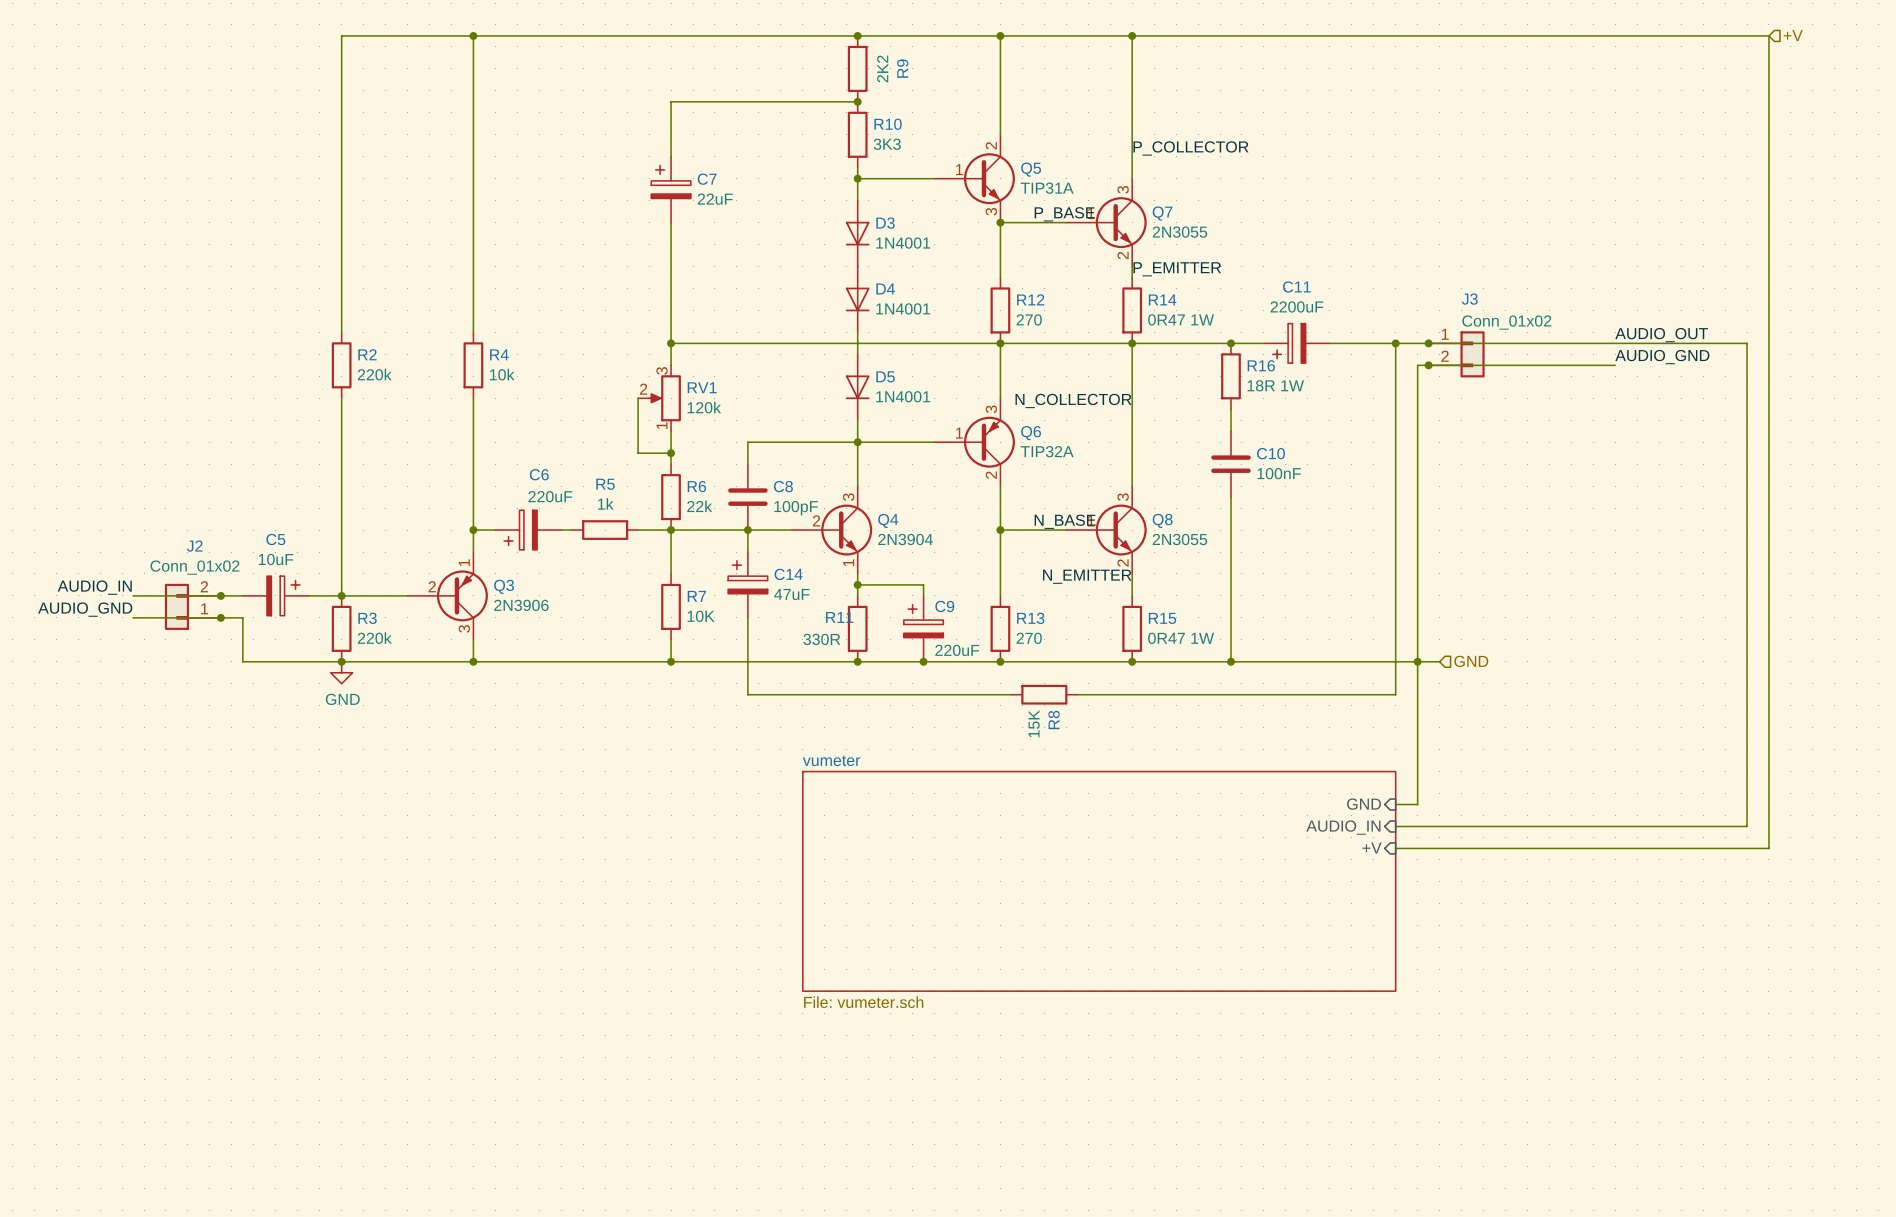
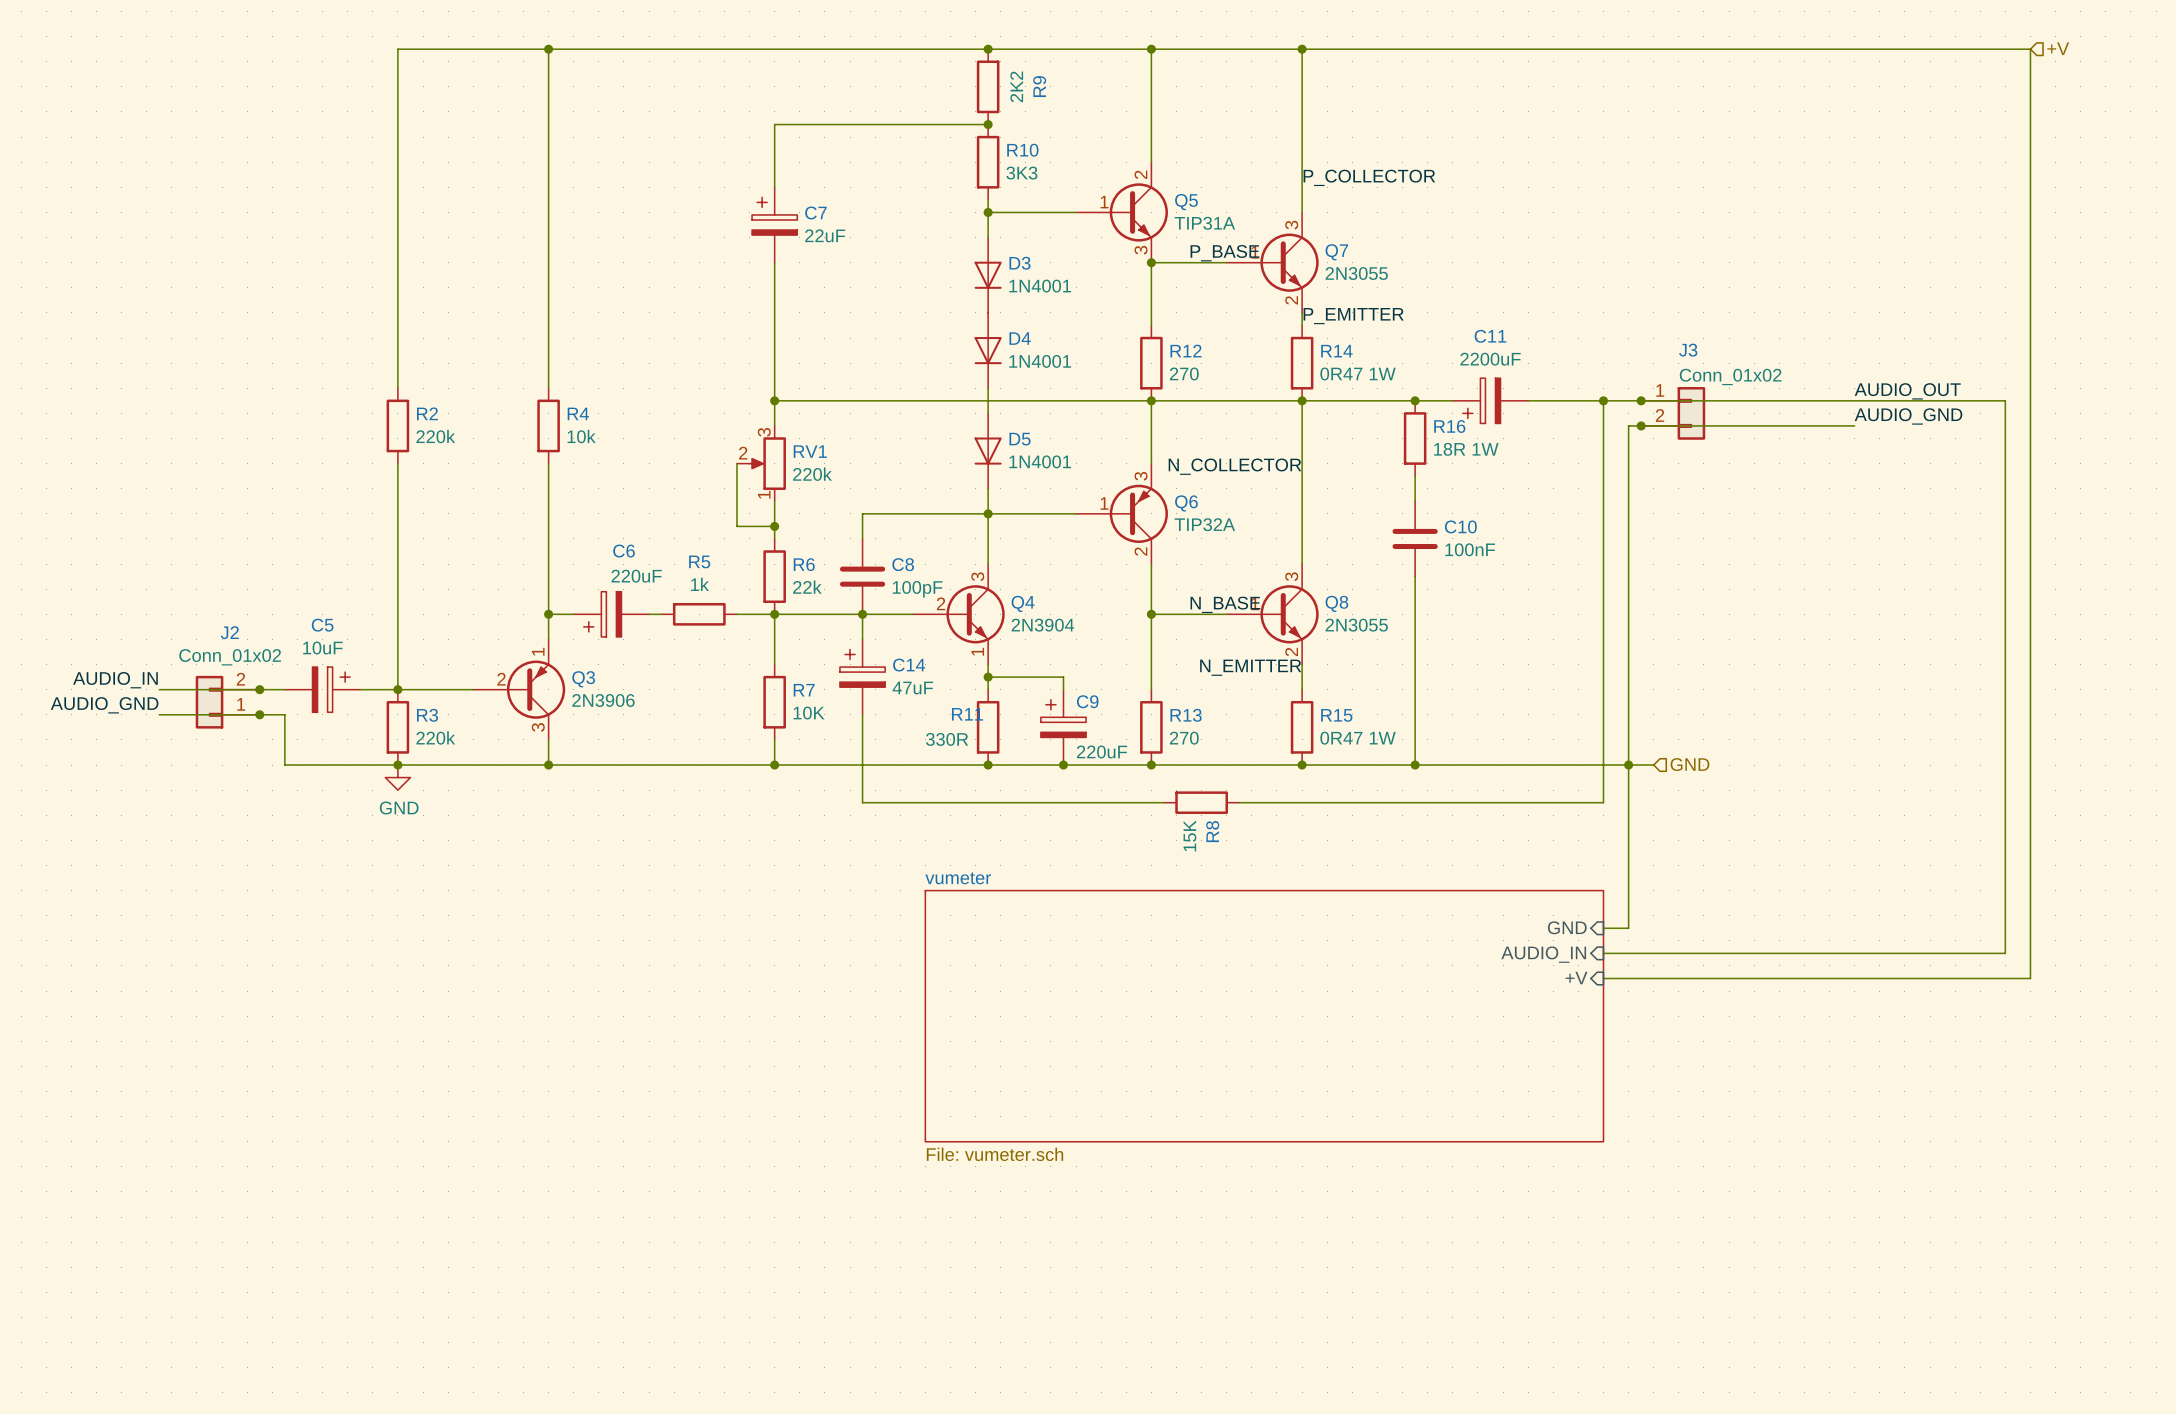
RV1 value: 120k (704, 407) -> 220k (812, 474)

